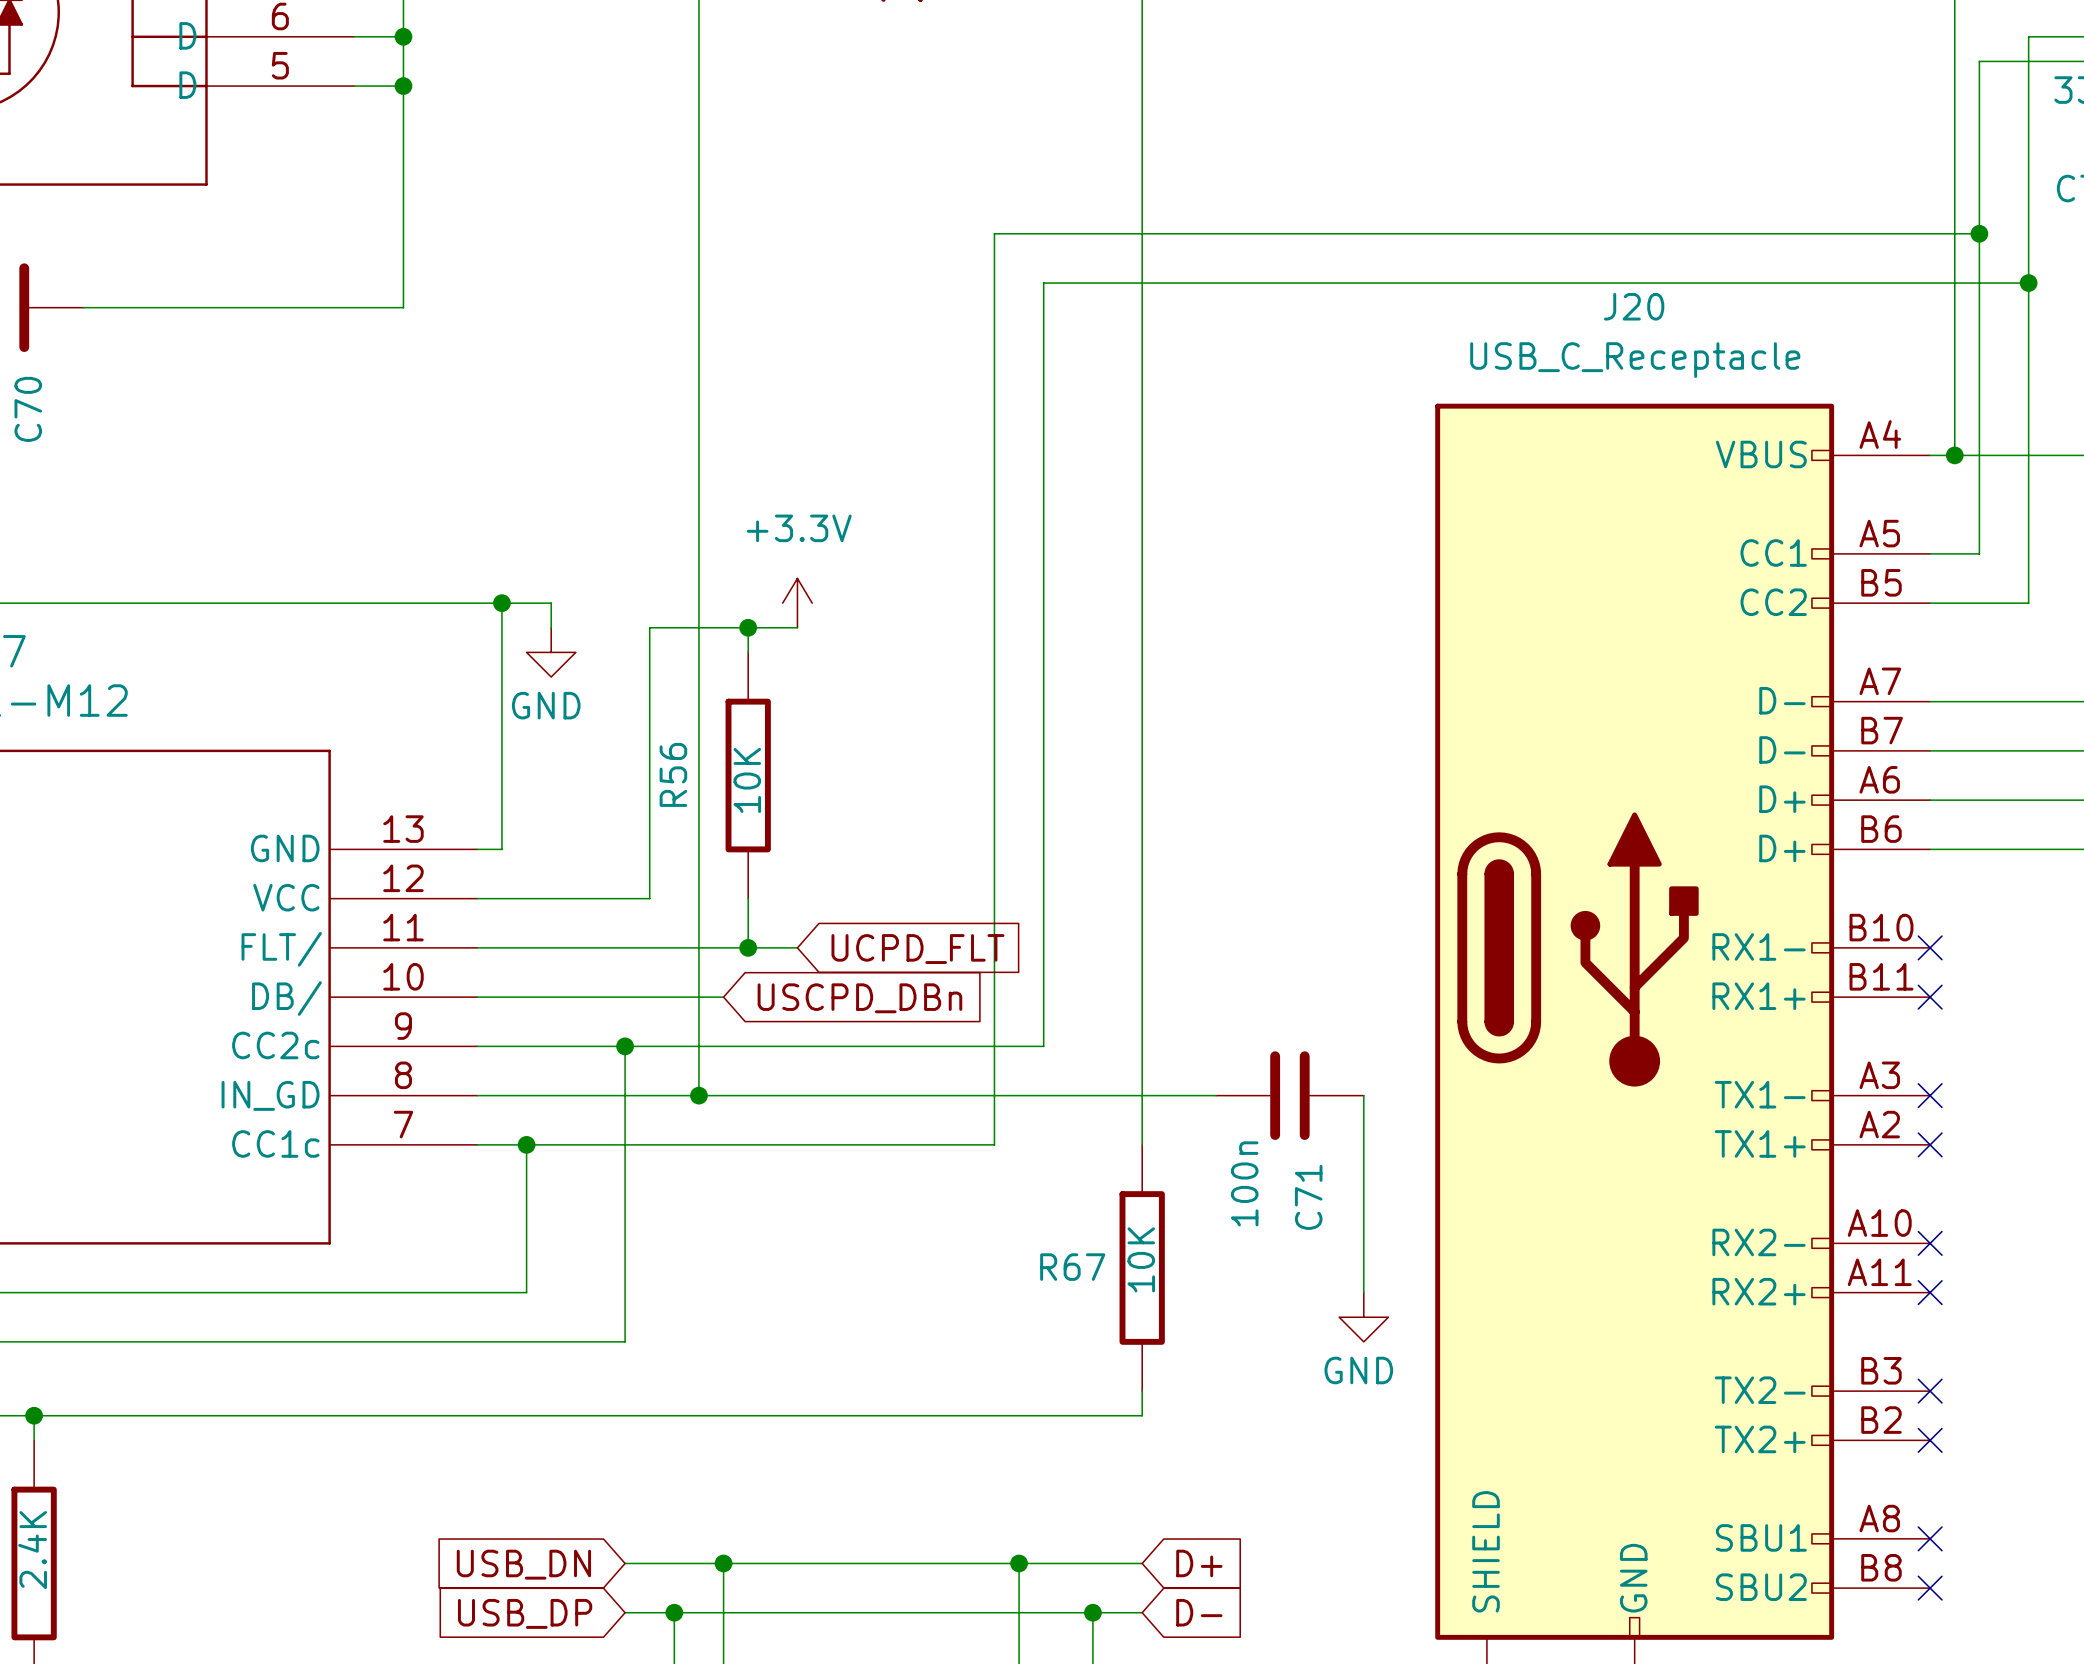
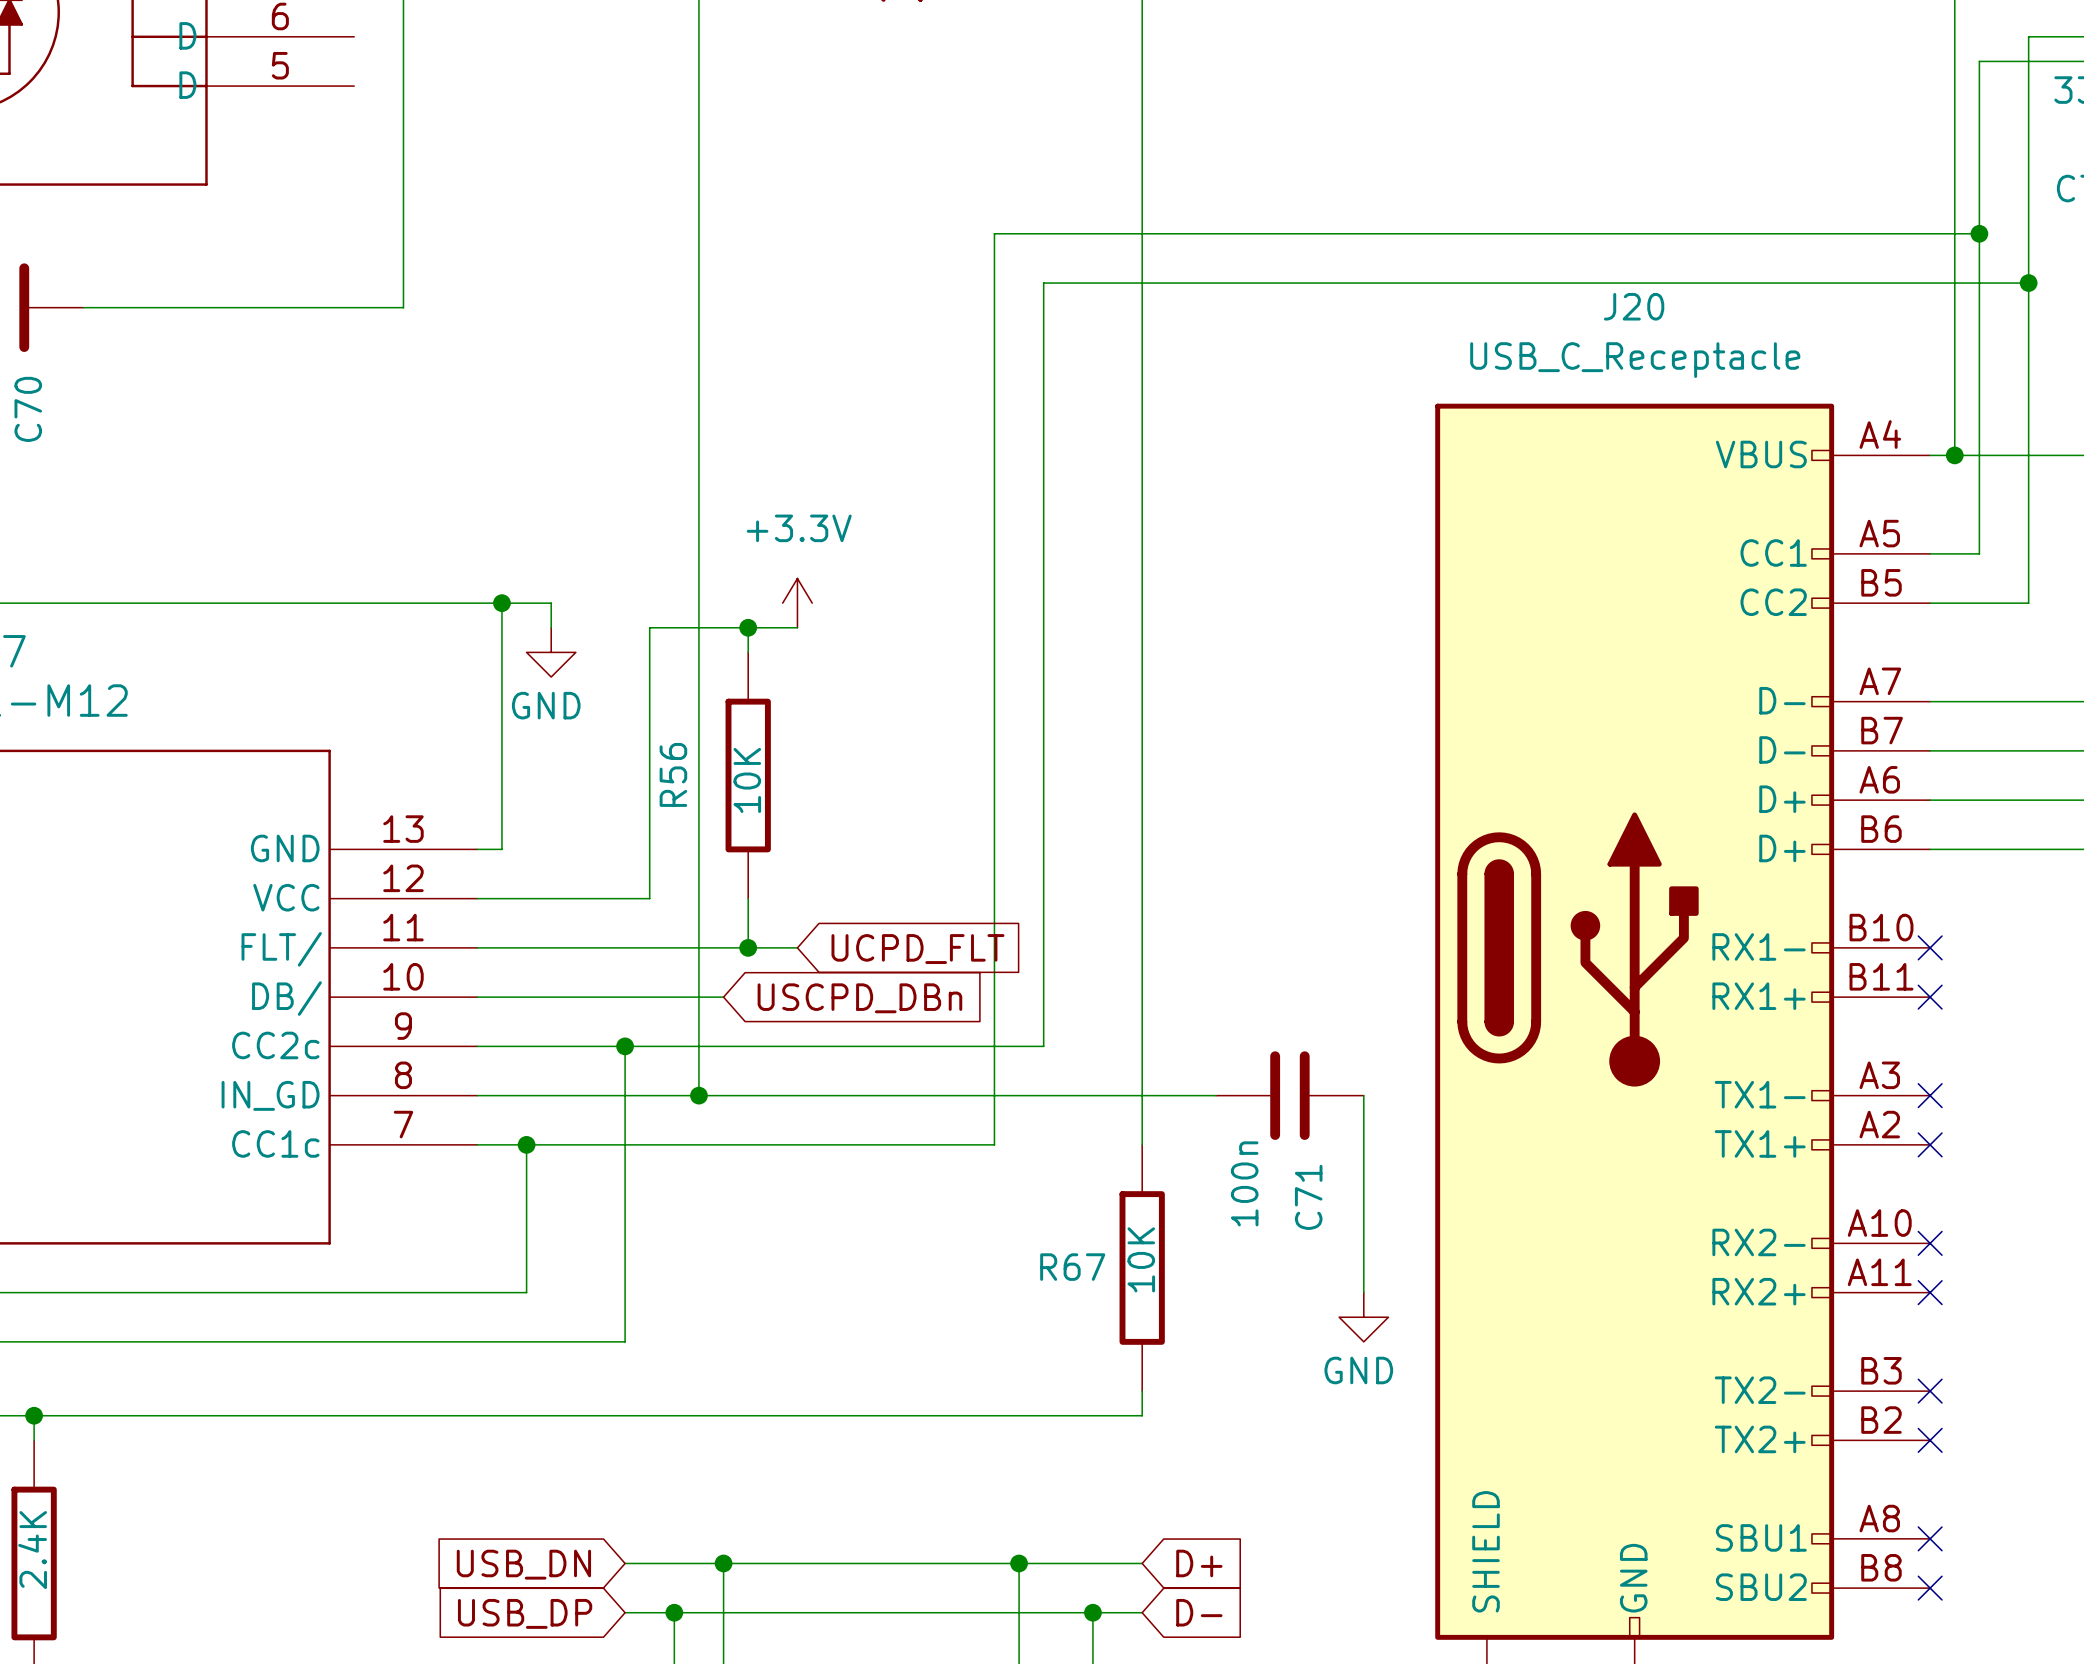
wire: (354, 36) (403, 36) -> none
junction: (403, 36) -> none
wire: (354, 86) (403, 86) -> none
junction: (403, 86) -> none

